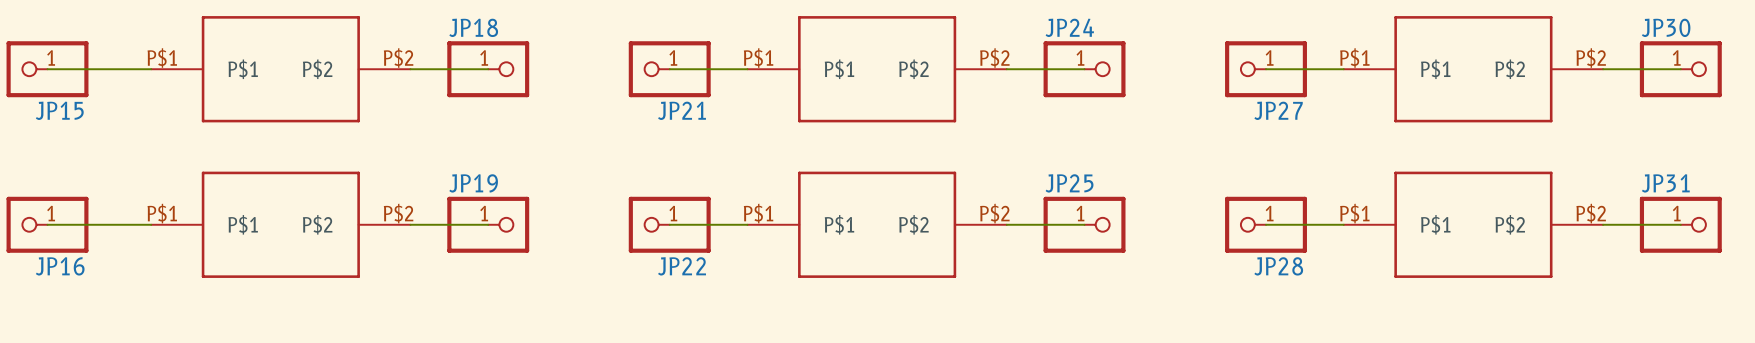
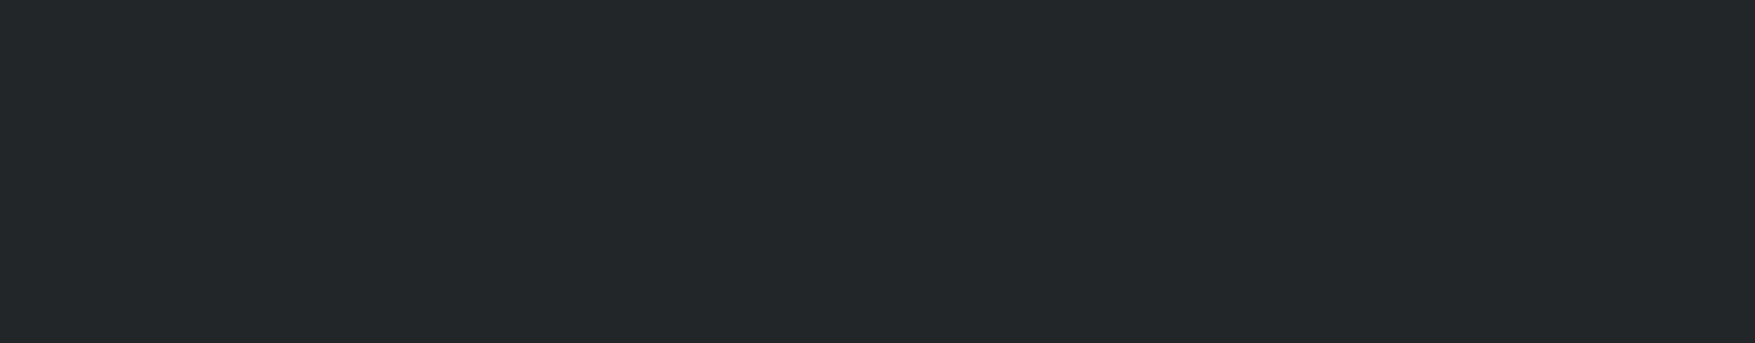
wire: (47, 69) (151, 69) -> none
JP15: (47, 69) -> none
part: (280, 69) -> none
wire: (410, 69) (488, 69) -> none
JP18: (488, 69) -> none
wire: (669, 69) (747, 69) -> none
JP21: (669, 69) -> none
part: (877, 69) -> none
wire: (1006, 69) (1084, 69) -> none
JP24: (1084, 69) -> none
wire: (1266, 69) (1343, 69) -> none
JP27: (1266, 69) -> none
part: (1473, 69) -> none
wire: (1603, 69) (1680, 69) -> none
JP30: (1680, 69) -> none
wire: (47, 224) (151, 224) -> none
JP16: (47, 224) -> none
part: (280, 224) -> none
wire: (410, 224) (488, 224) -> none
JP19: (488, 224) -> none
wire: (669, 224) (747, 224) -> none
JP22: (669, 224) -> none
part: (877, 224) -> none
wire: (1006, 224) (1084, 224) -> none
JP25: (1084, 224) -> none
wire: (1266, 224) (1343, 224) -> none
JP28: (1266, 224) -> none
part: (1473, 224) -> none
wire: (1603, 224) (1680, 224) -> none
JP31: (1680, 224) -> none

